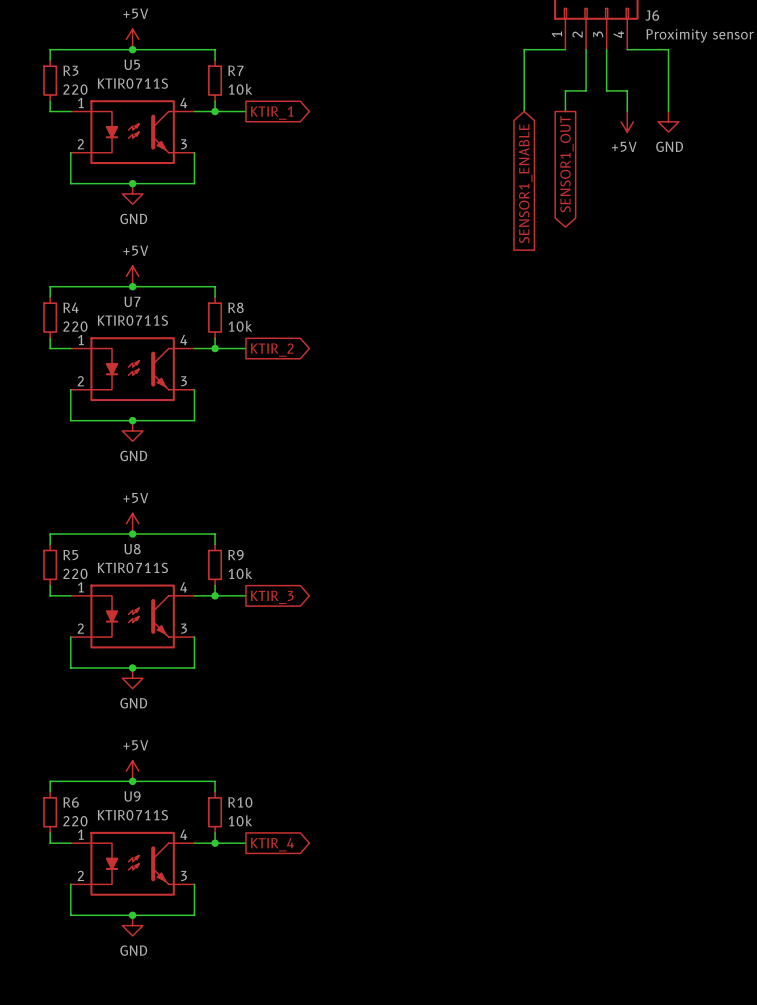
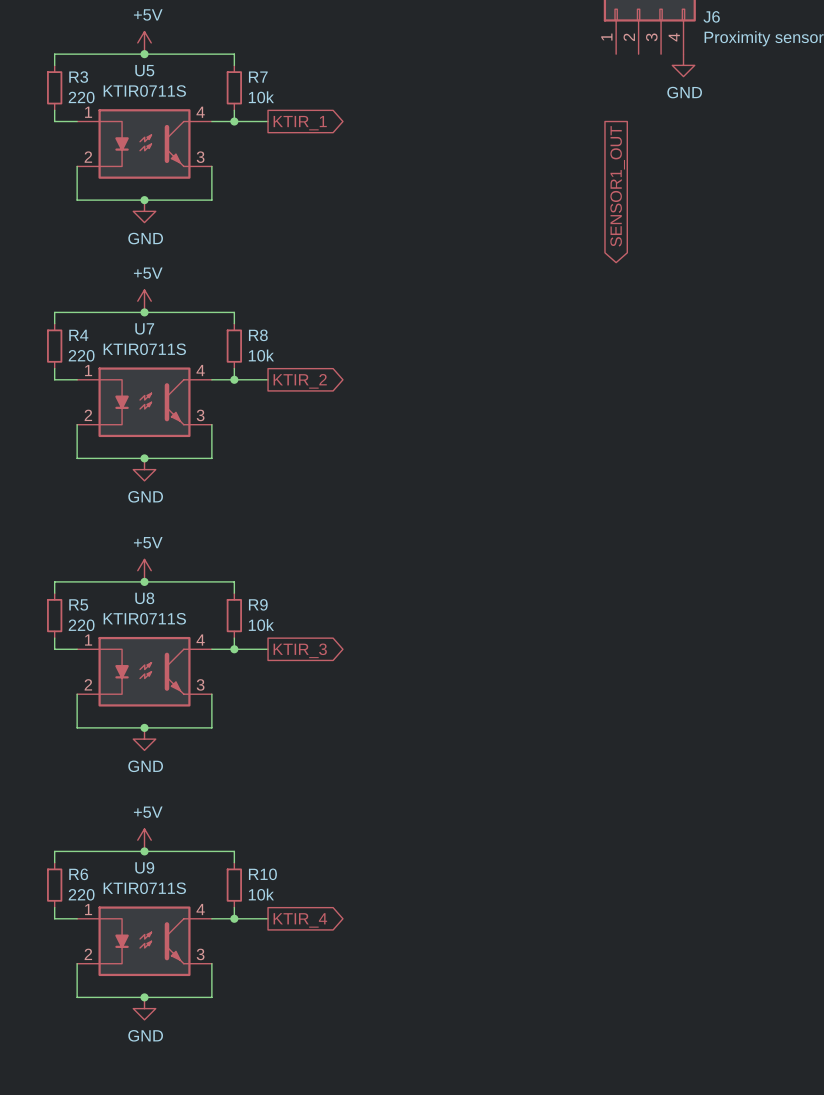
wire: (565, 49) (524, 49) (524, 111) -> none
wire: (586, 49) (586, 90) (565, 90) (565, 111) -> none
wire: (606, 49) (606, 90) (627, 90) (627, 111) -> none
wire: (627, 49) (668, 49) (668, 111) -> none
power symbol: +5V (627, 121) -> none
power symbol position: GND (668, 121) -> GND (683, 65)
global label: SENSOR1_ENABLE (525, 183) -> none

